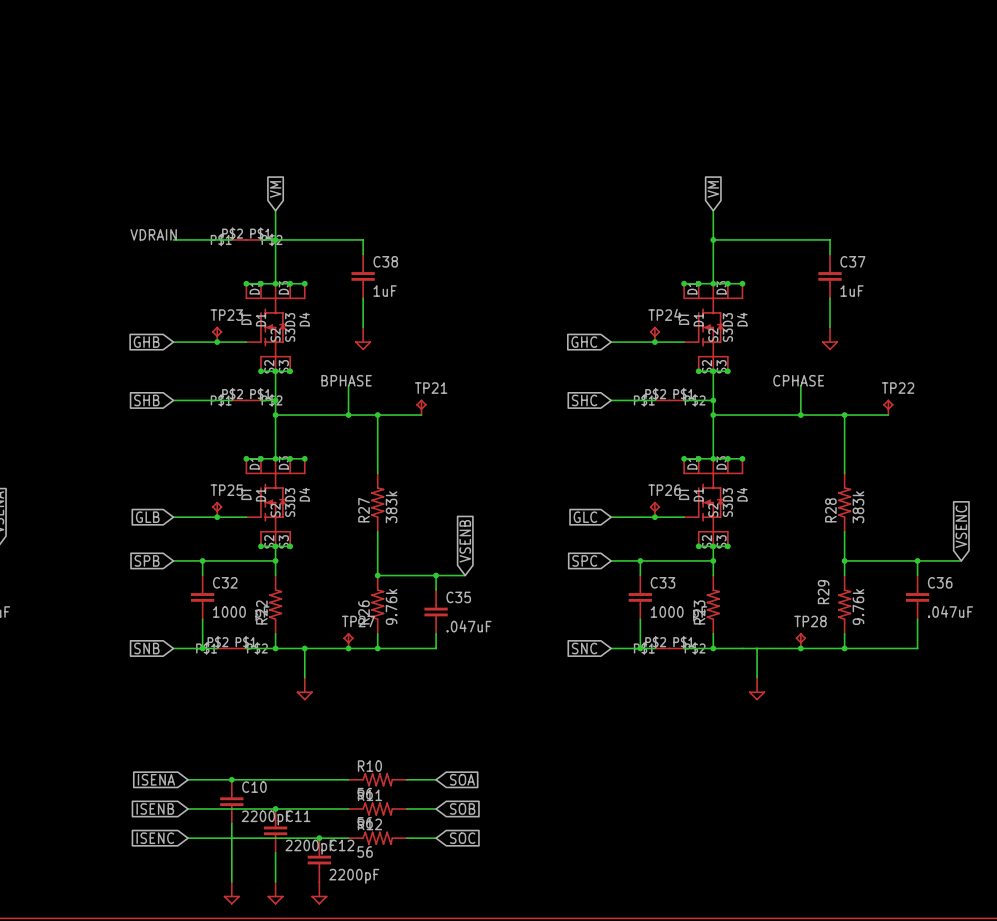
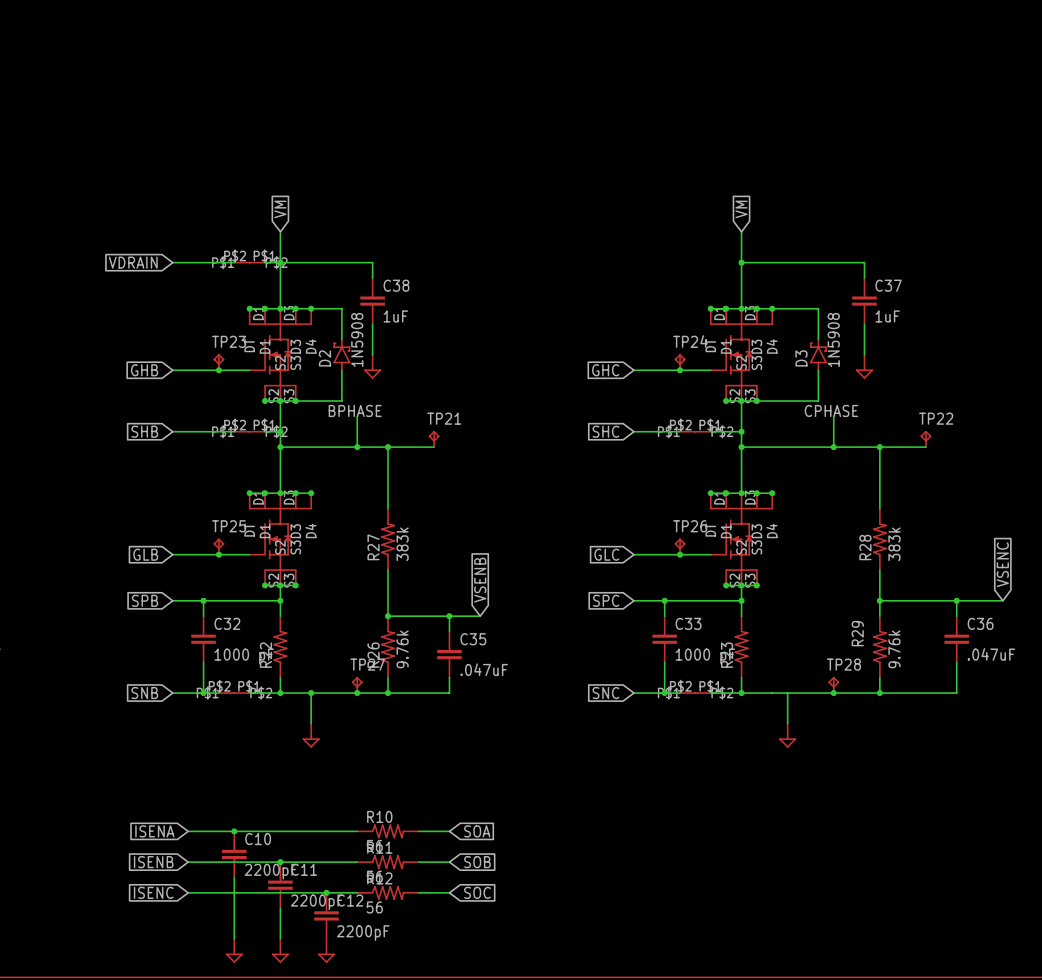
label: VDRAIN (153, 234) -> none
global label: none -> VDRAIN (133, 262)
wire: none -> (311, 308) (341, 308) (341, 339)
wire: none -> (772, 308) (818, 308) (818, 339)
D2: none -> 1N5908 (341, 354)
D3: none -> 1N5908 (818, 354)
wire: none -> (341, 370) (341, 400) (295, 400)
wire: none -> (818, 370) (818, 400) (756, 400)

